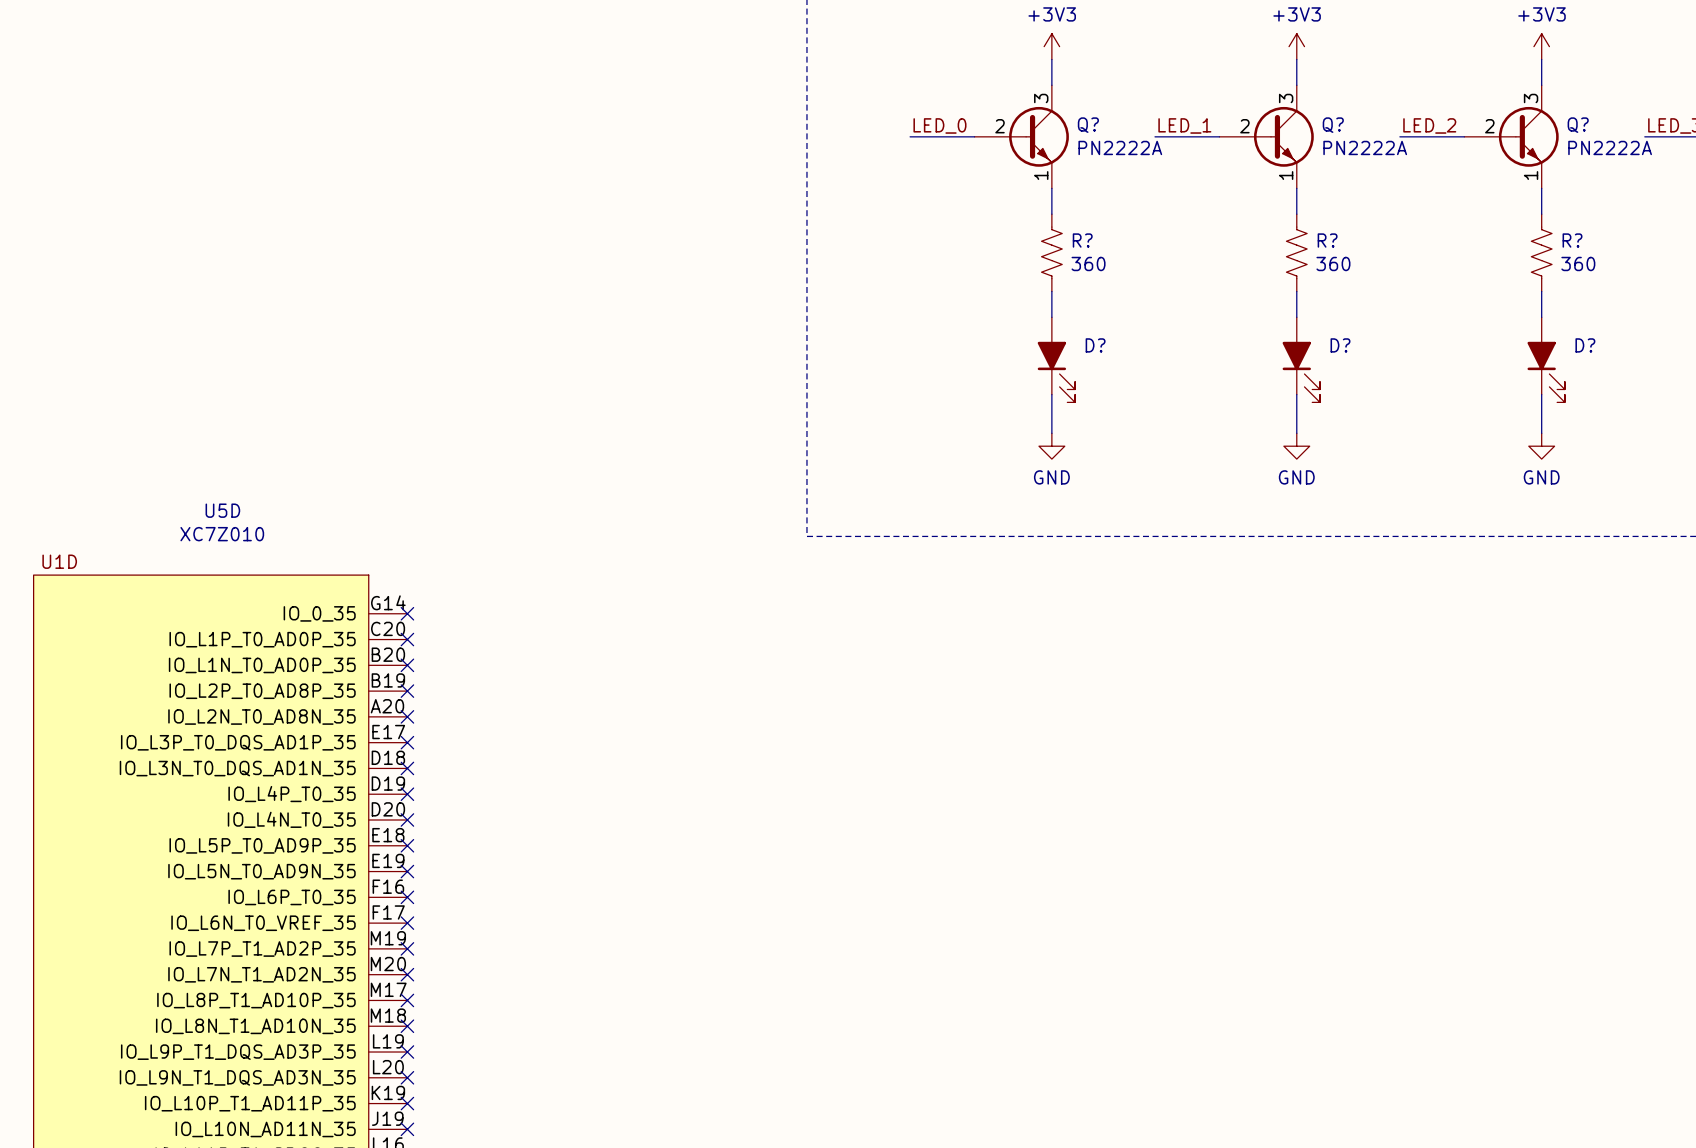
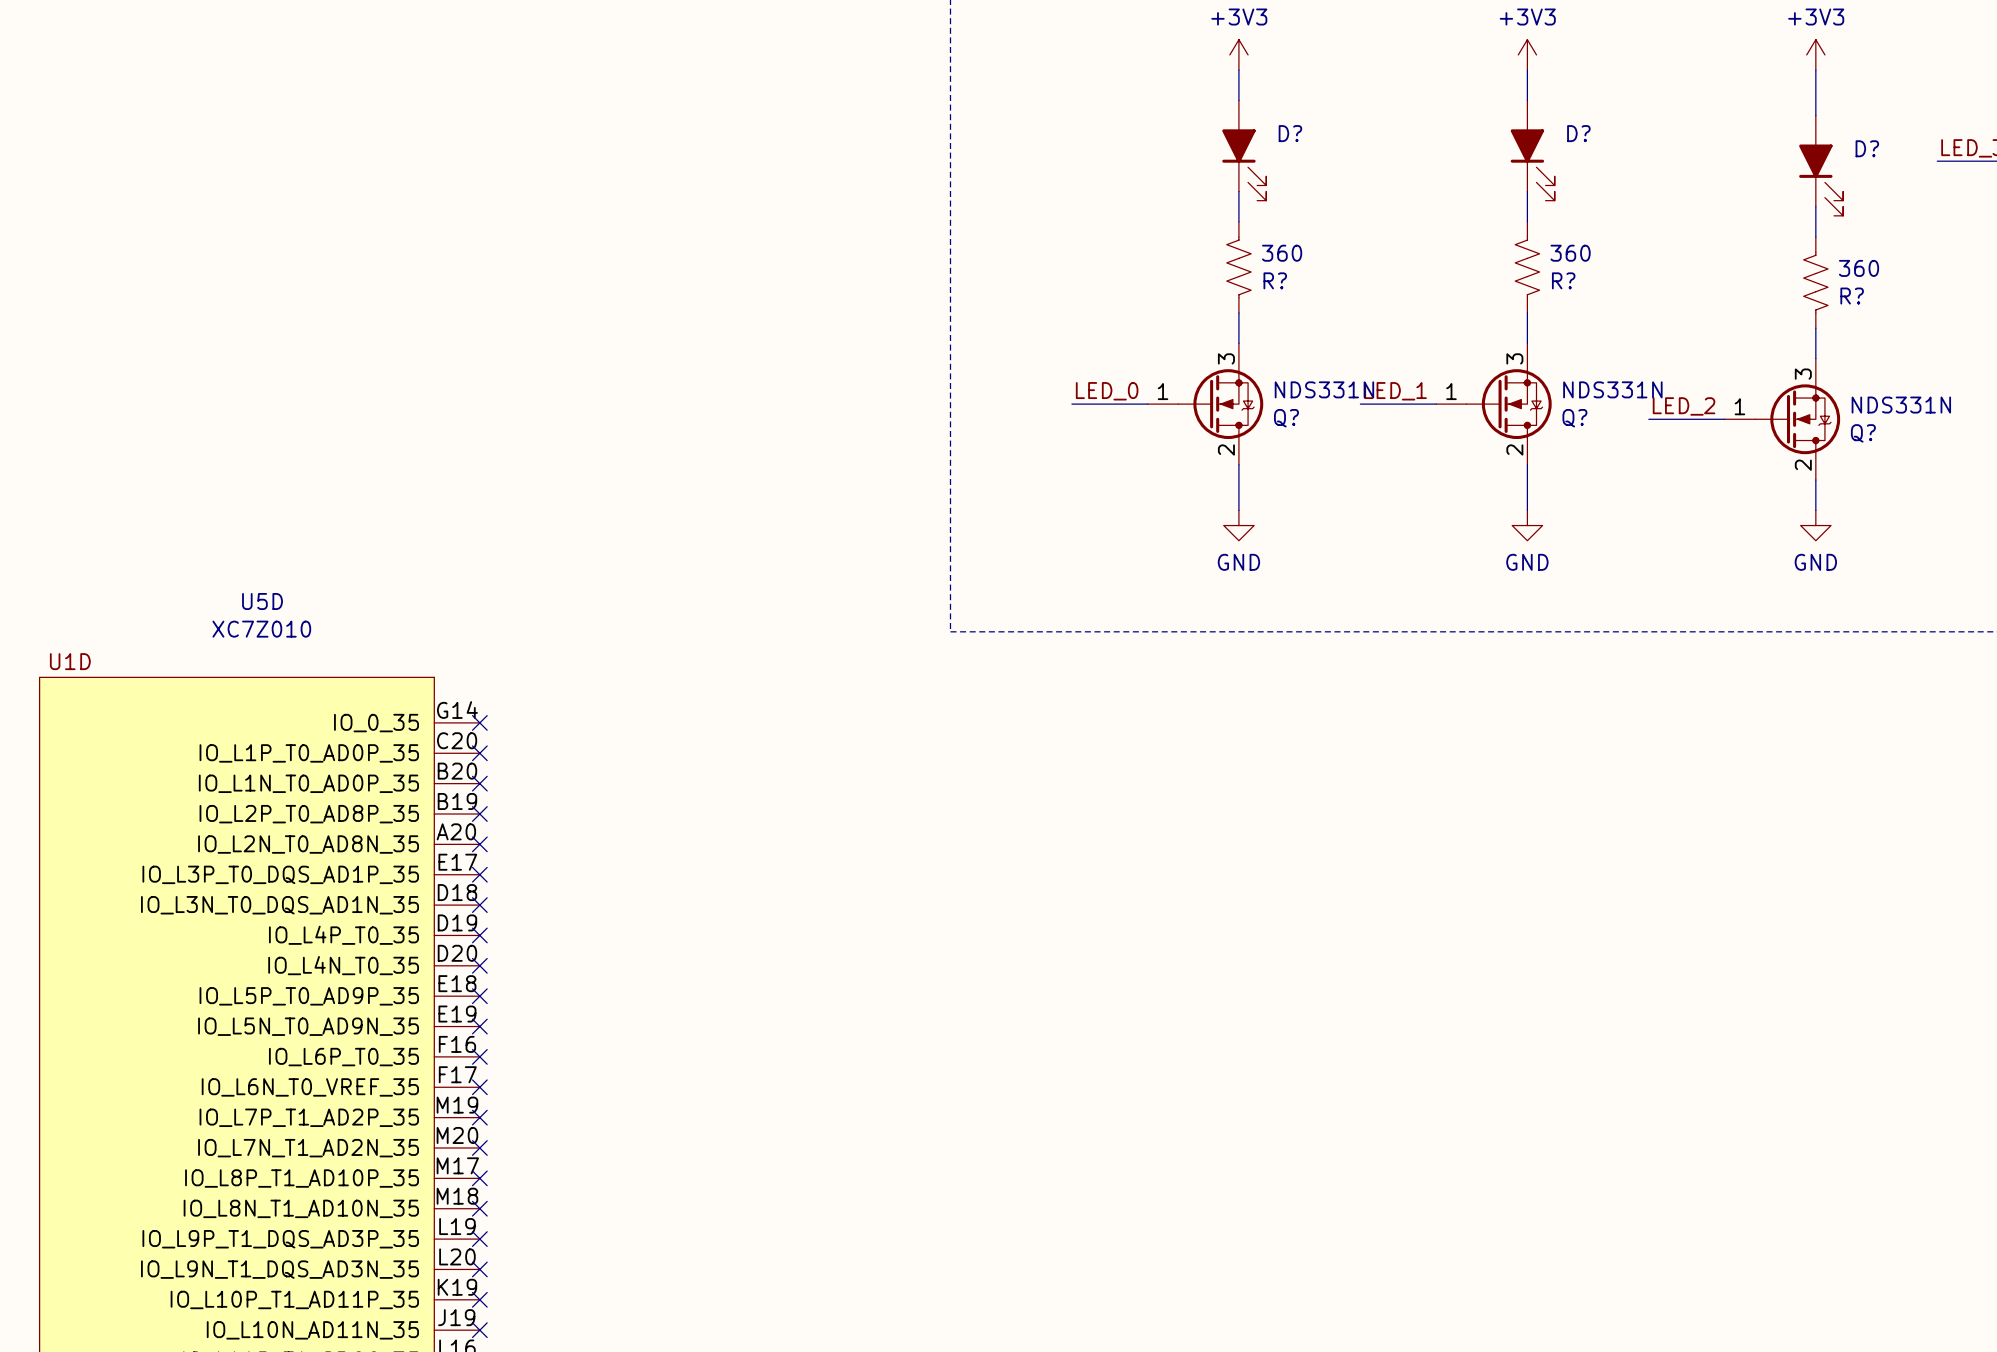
label position: LED_0 (939, 125) -> LED_0 (1107, 391)
label position: LED_1 (1184, 125) -> LED_1 (1395, 391)
label position: LED_2 (1429, 125) -> LED_2 (1684, 406)
D?: none -> (1244, 150)
D?: none -> (1532, 150)
wire: (910, 136) (974, 136) -> (1071, 404) (1147, 404)
Q?: PN2222A (1021, 136) -> none
wire: (1155, 136) (1219, 136) -> (1360, 404) (1436, 404)
Q?: PN2222A (1266, 136) -> none
wire: (1399, 136) (1464, 136) -> (1648, 419) (1724, 419)
Q?: PN2222A (1511, 136) -> none
D?: none -> (1821, 165)
R?: none -> 360 (1238, 267)
R?: none -> 360 (1527, 267)
R?: none -> 360 (1815, 282)
R?: 360 (1051, 252) -> none
R?: 360 (1296, 252) -> none
R?: 360 (1541, 252) -> none
Q?: none -> NDS331N (1205, 404)
Q?: none -> NDS331N (1493, 404)
Q?: none -> NDS331N (1782, 419)
D?: (1056, 359) -> none
D?: (1301, 359) -> none
D?: (1546, 359) -> none

